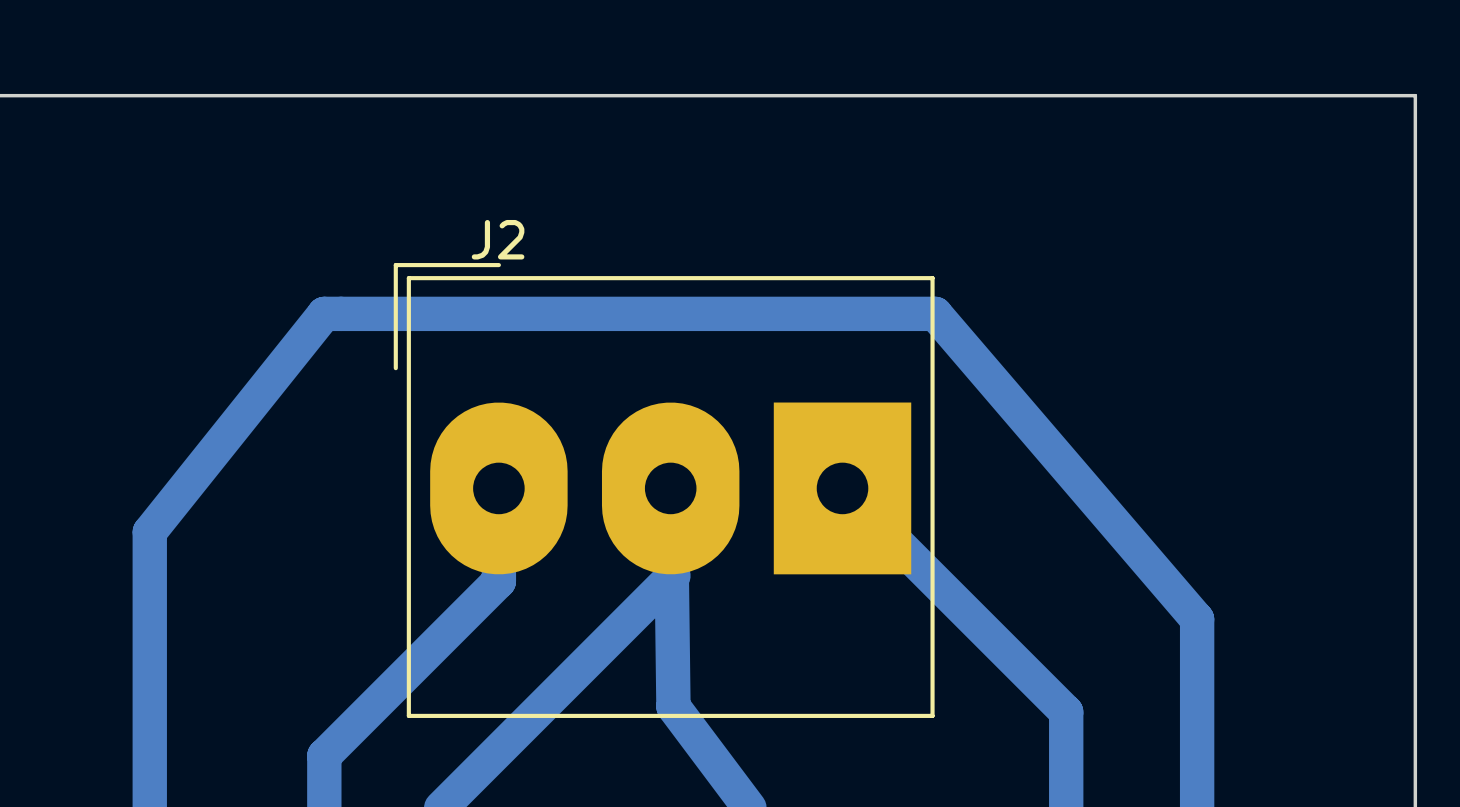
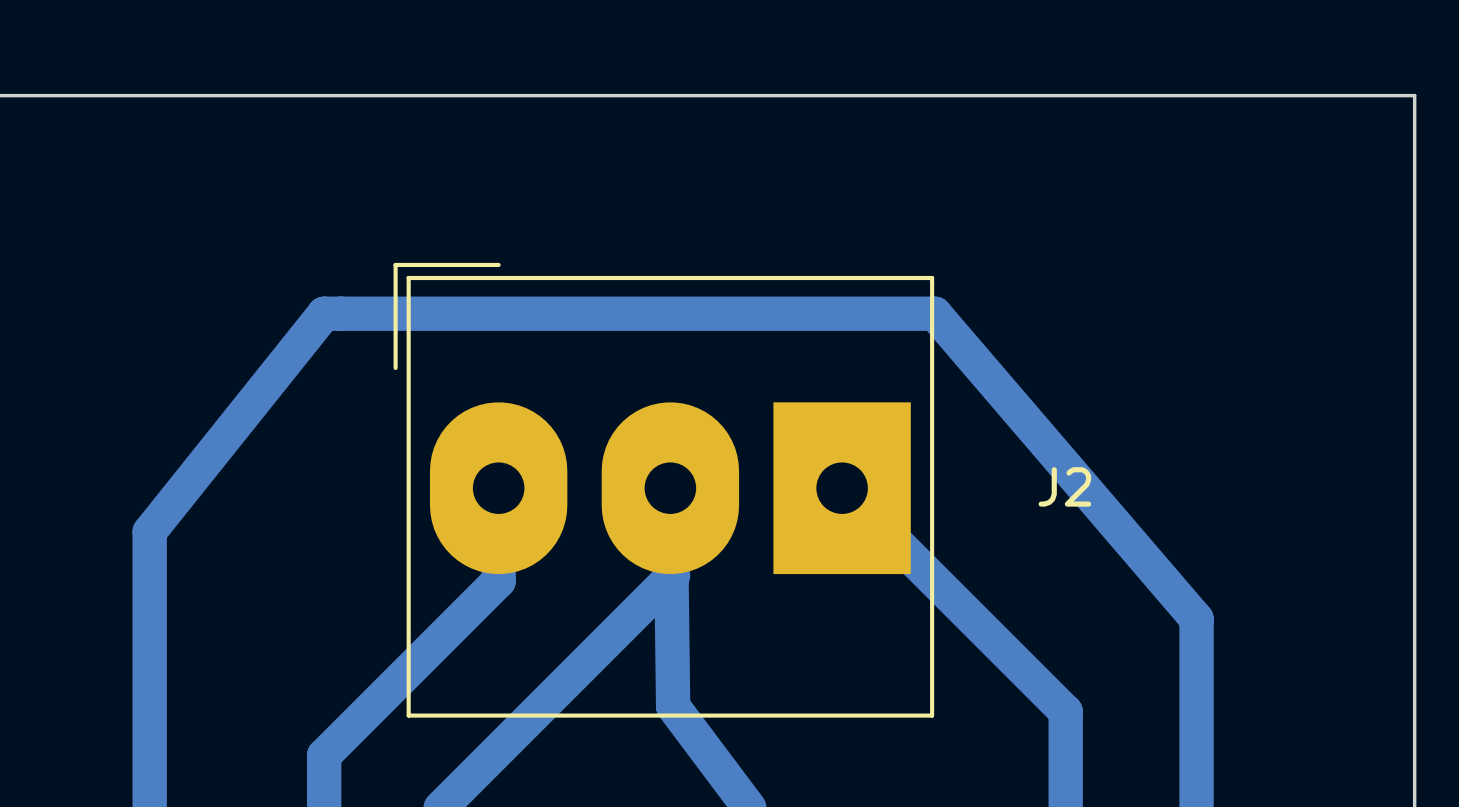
J2 name position: J2 (498, 239) -> J2 (1064, 486)

